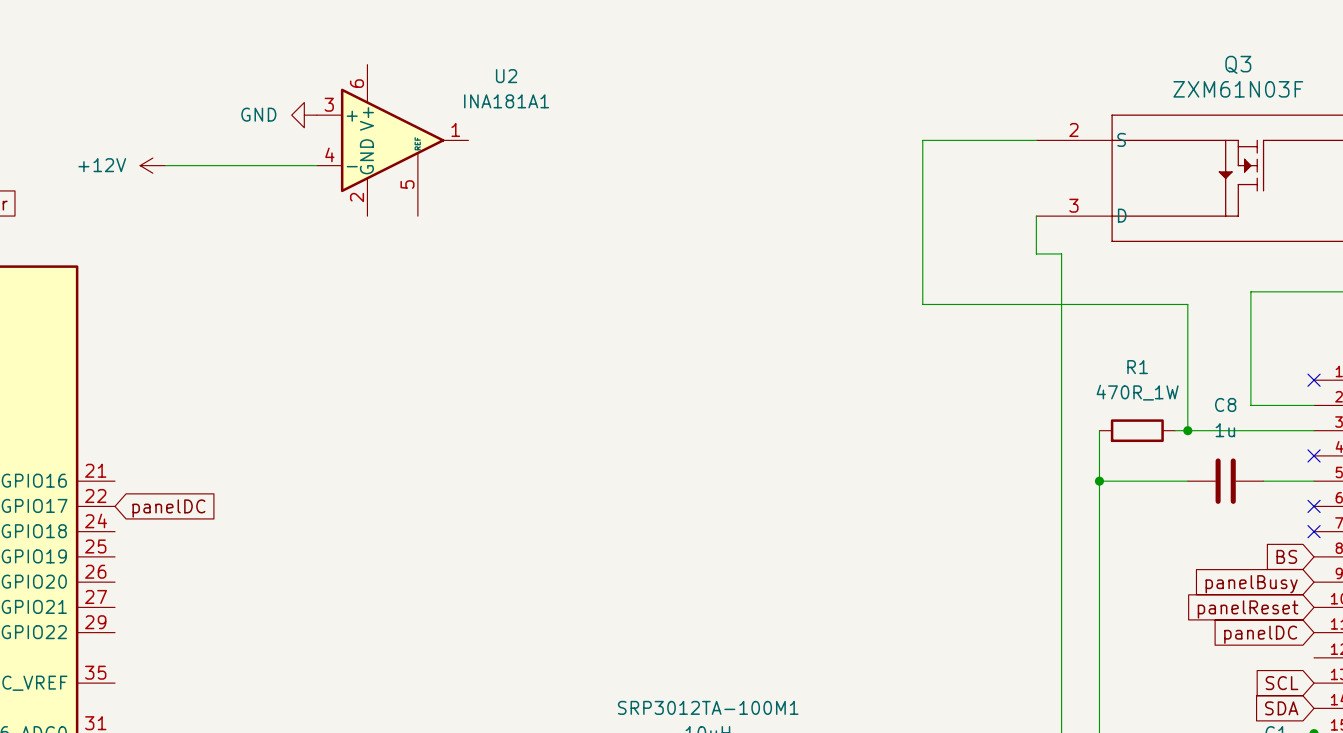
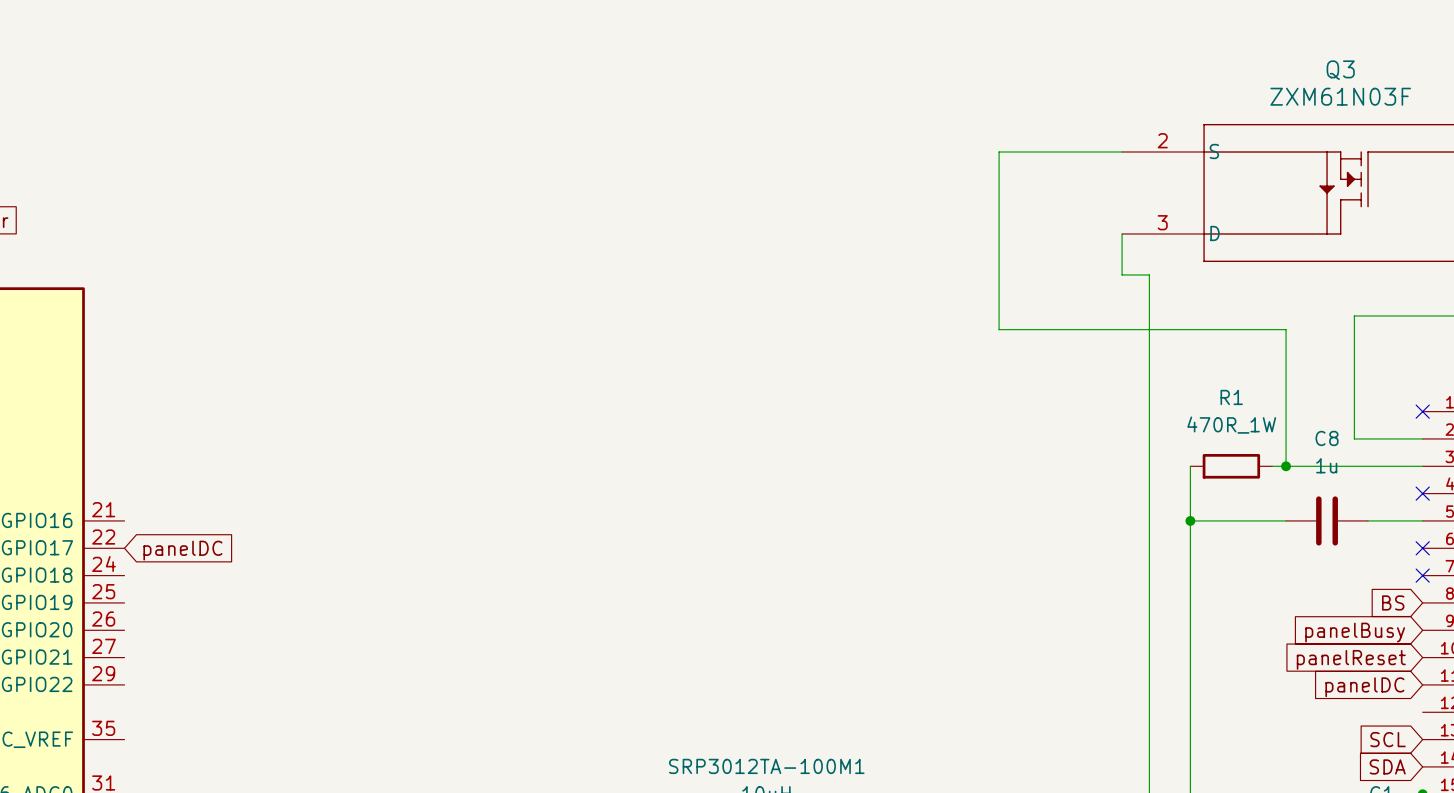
power symbol: GND (304, 115) -> none
U2: INA181A1 (392, 140) -> none
power symbol: +12V (152, 165) -> none
wire: (165, 165) (316, 165) -> none

